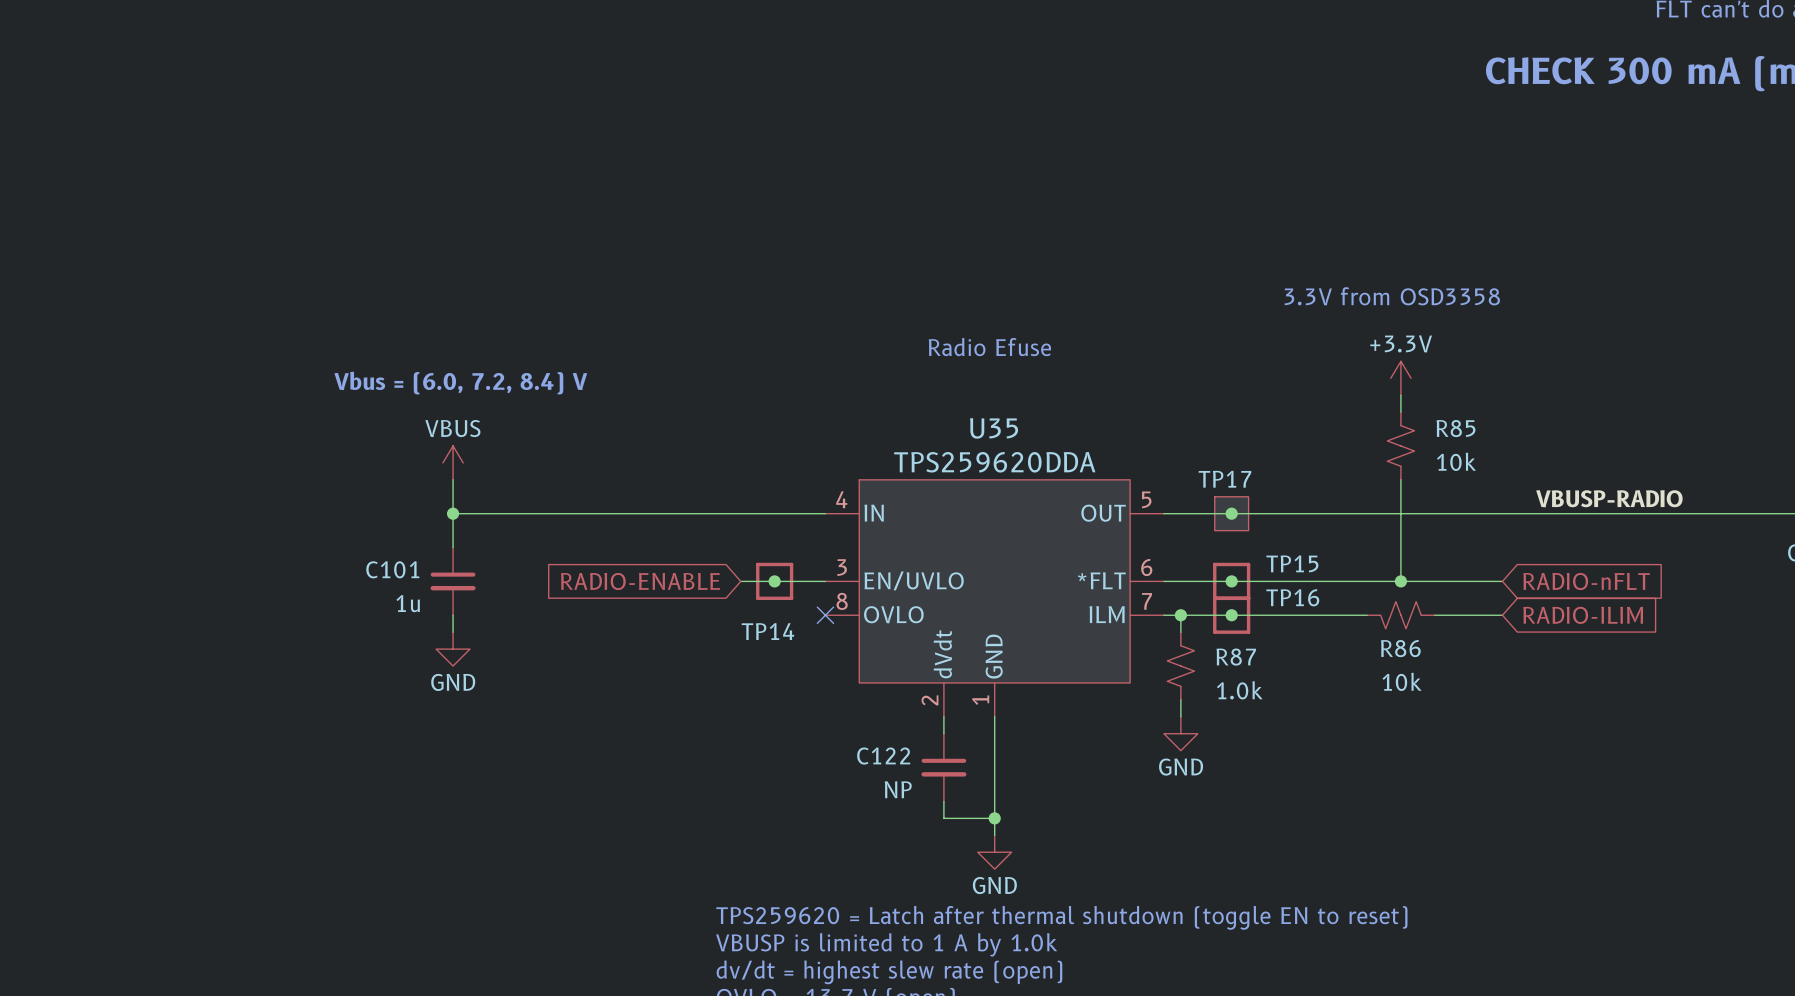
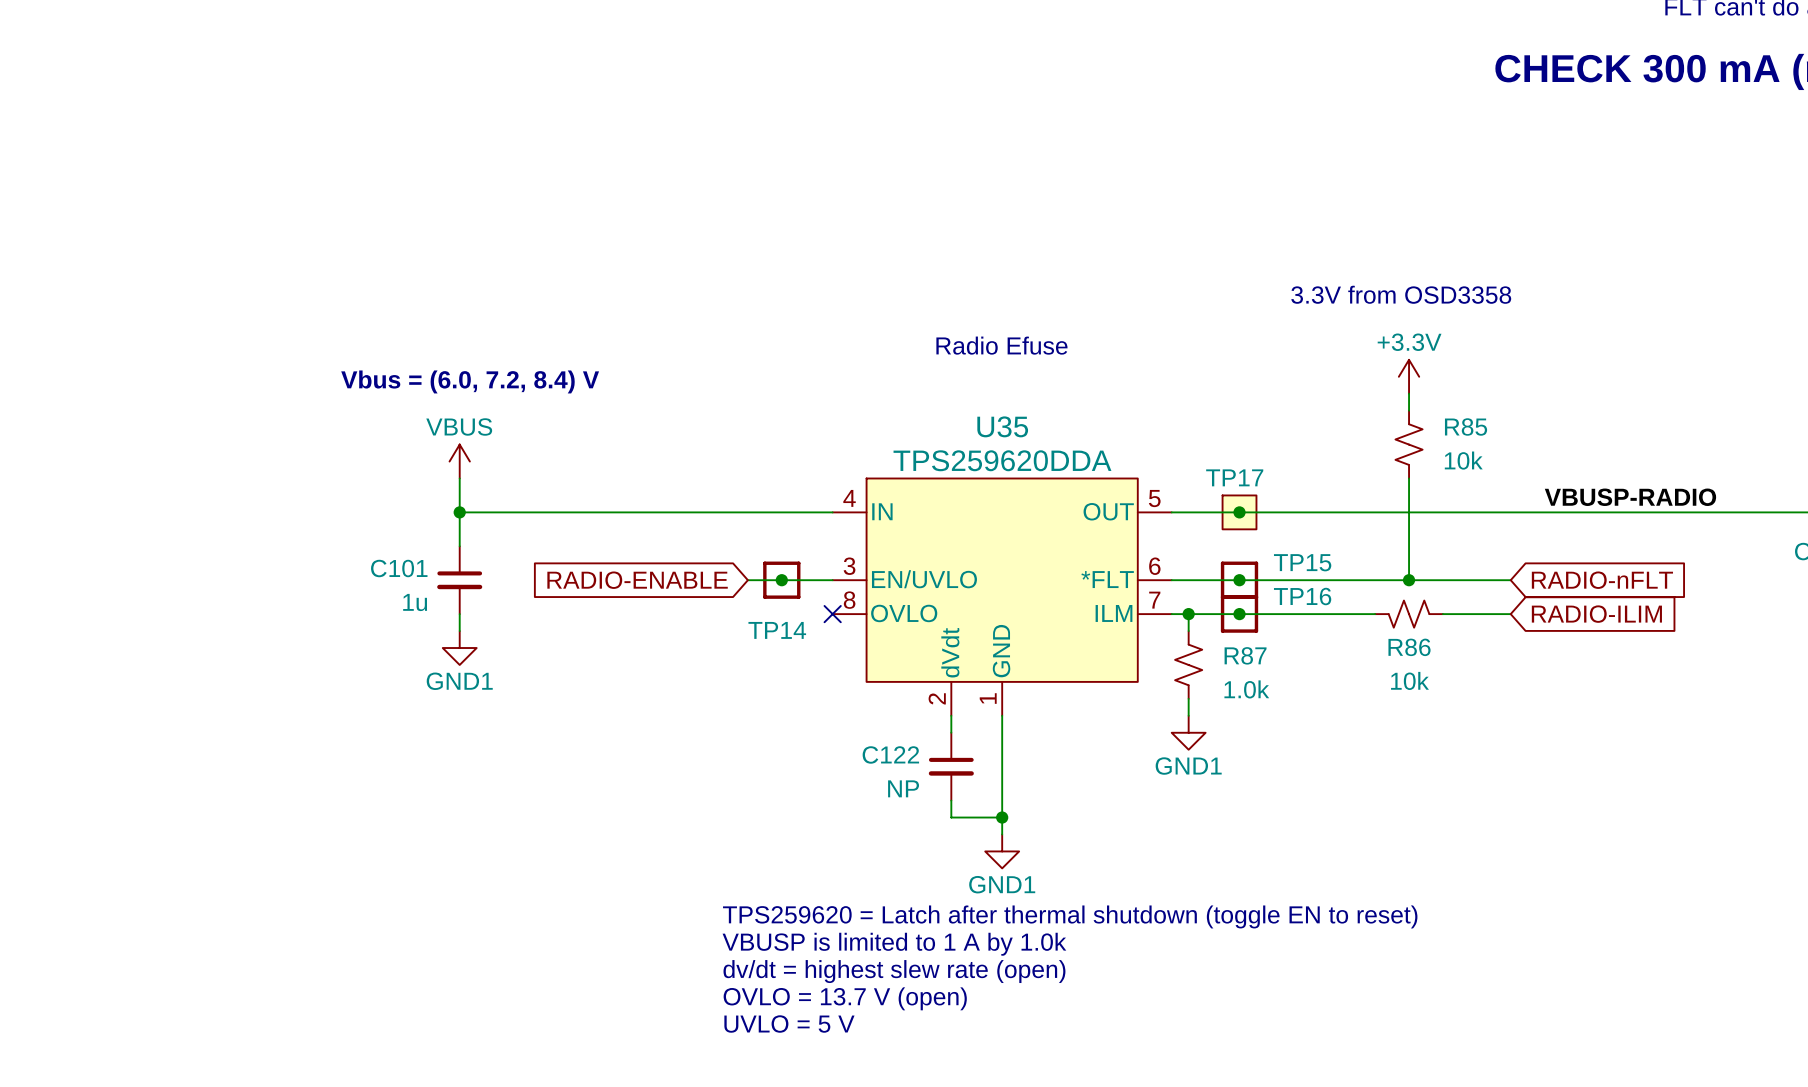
power symbol: GND (453, 649) -> GND1 (459, 648)
power symbol: GND (1180, 733) -> GND1 (1188, 732)
power symbol: GND (994, 852) -> GND1 (1002, 851)

